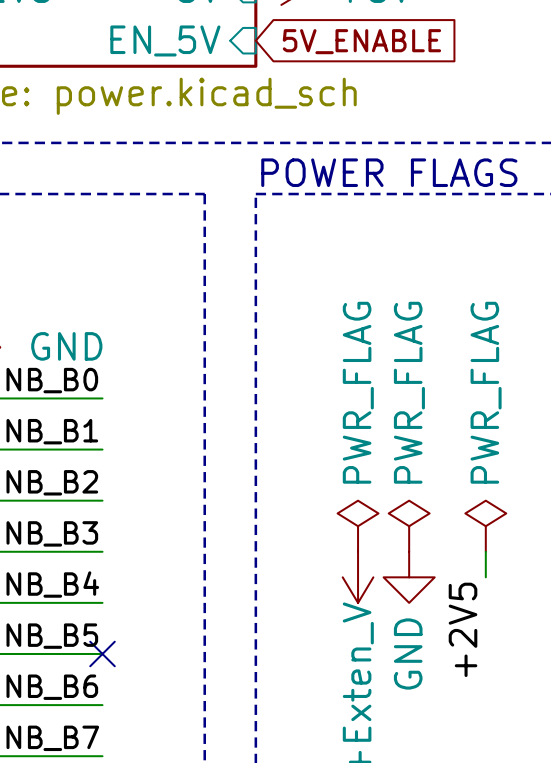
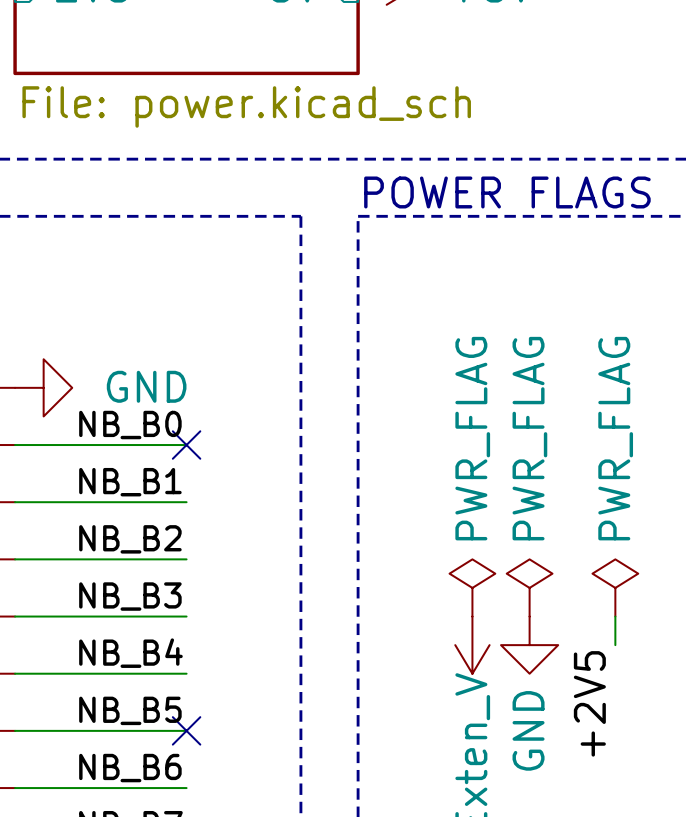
sheet pin: EN_5V (165, 40) -> none
global label: 5V_ENABLE (361, 41) -> none
no-connect mark: none -> (186, 445)

